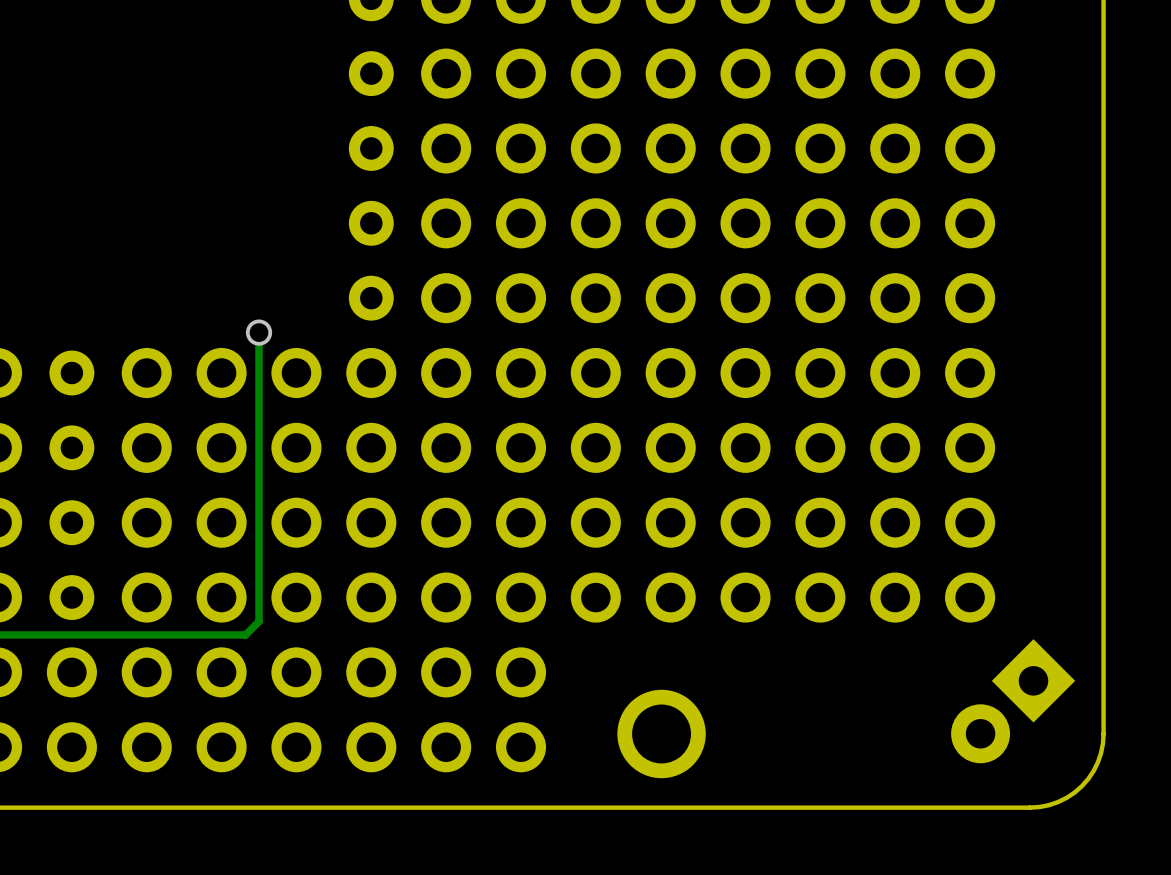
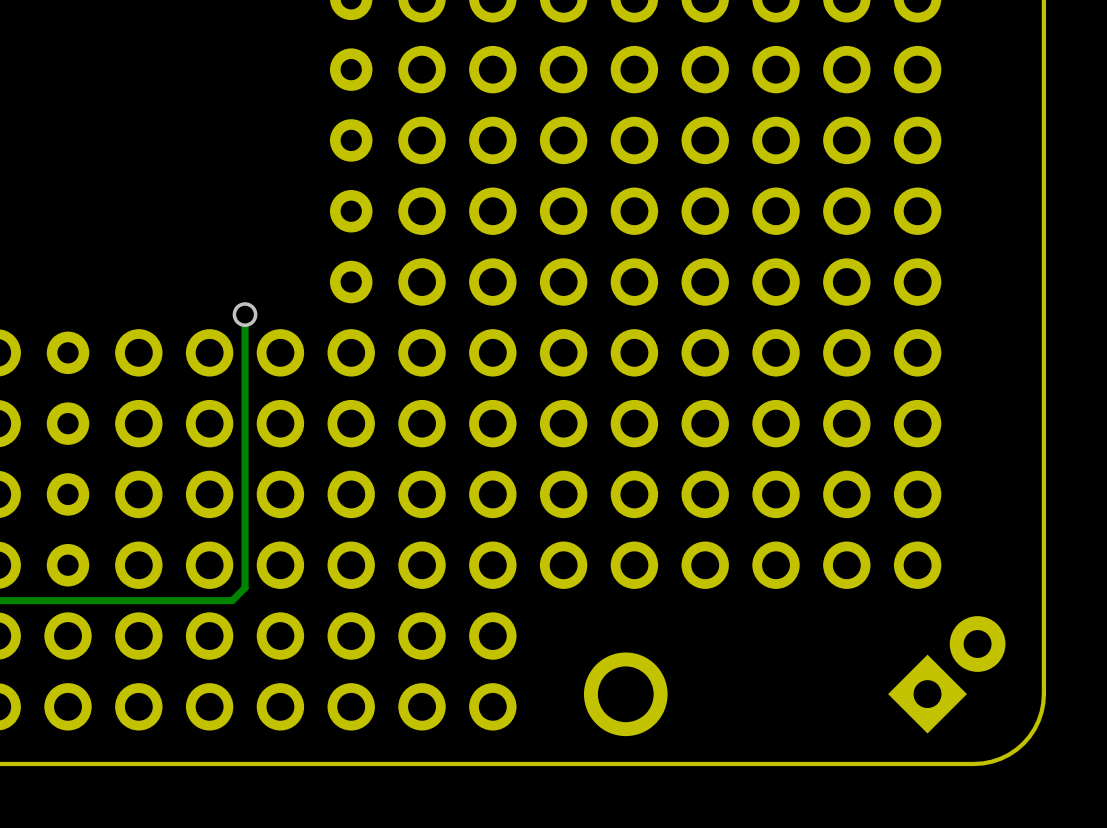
part rotation: 0° (1013, 701) -> 180° (946, 674)

